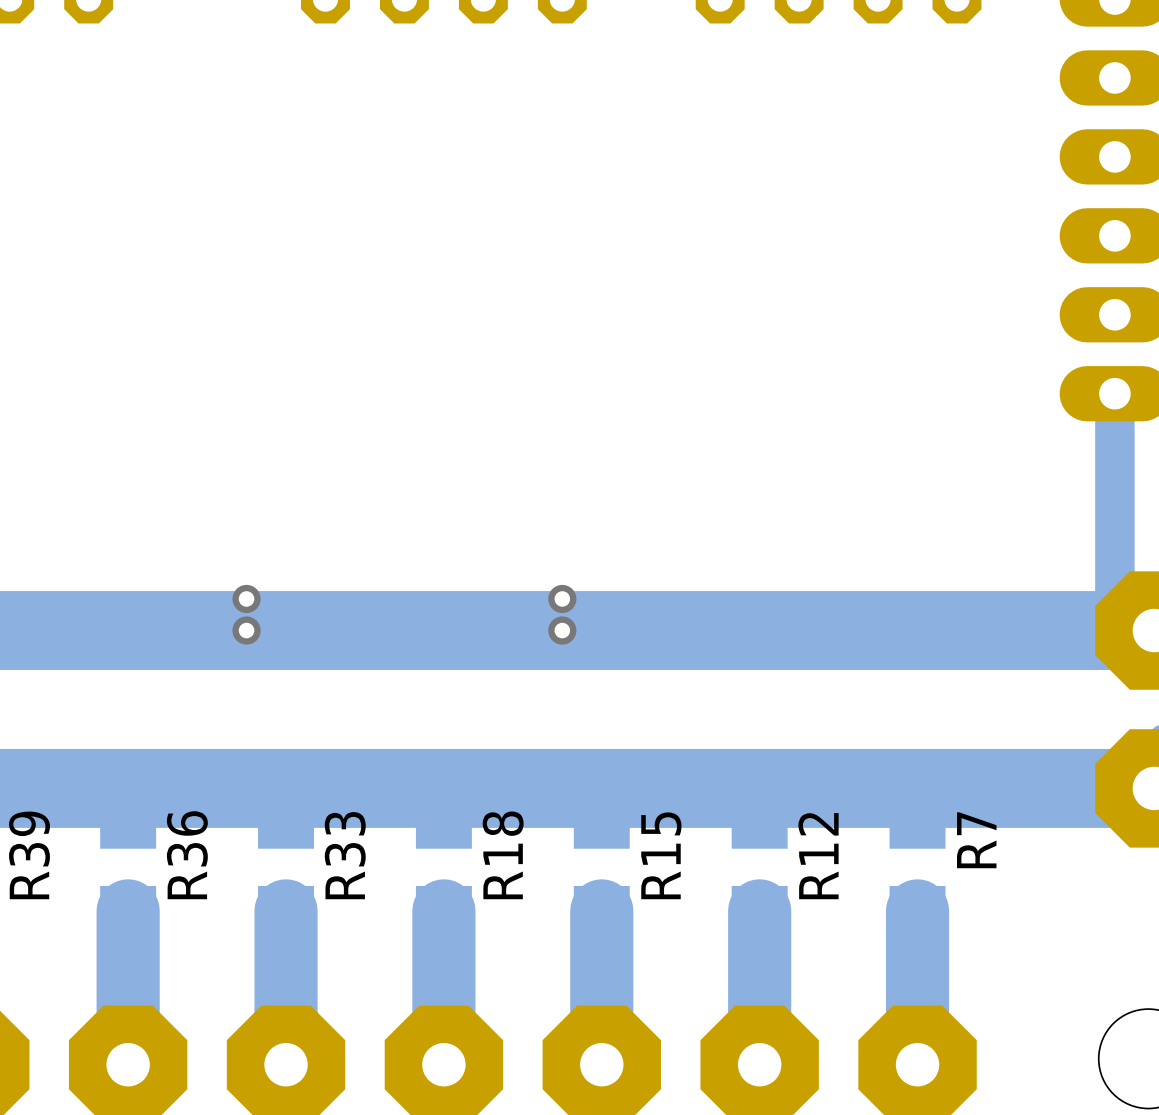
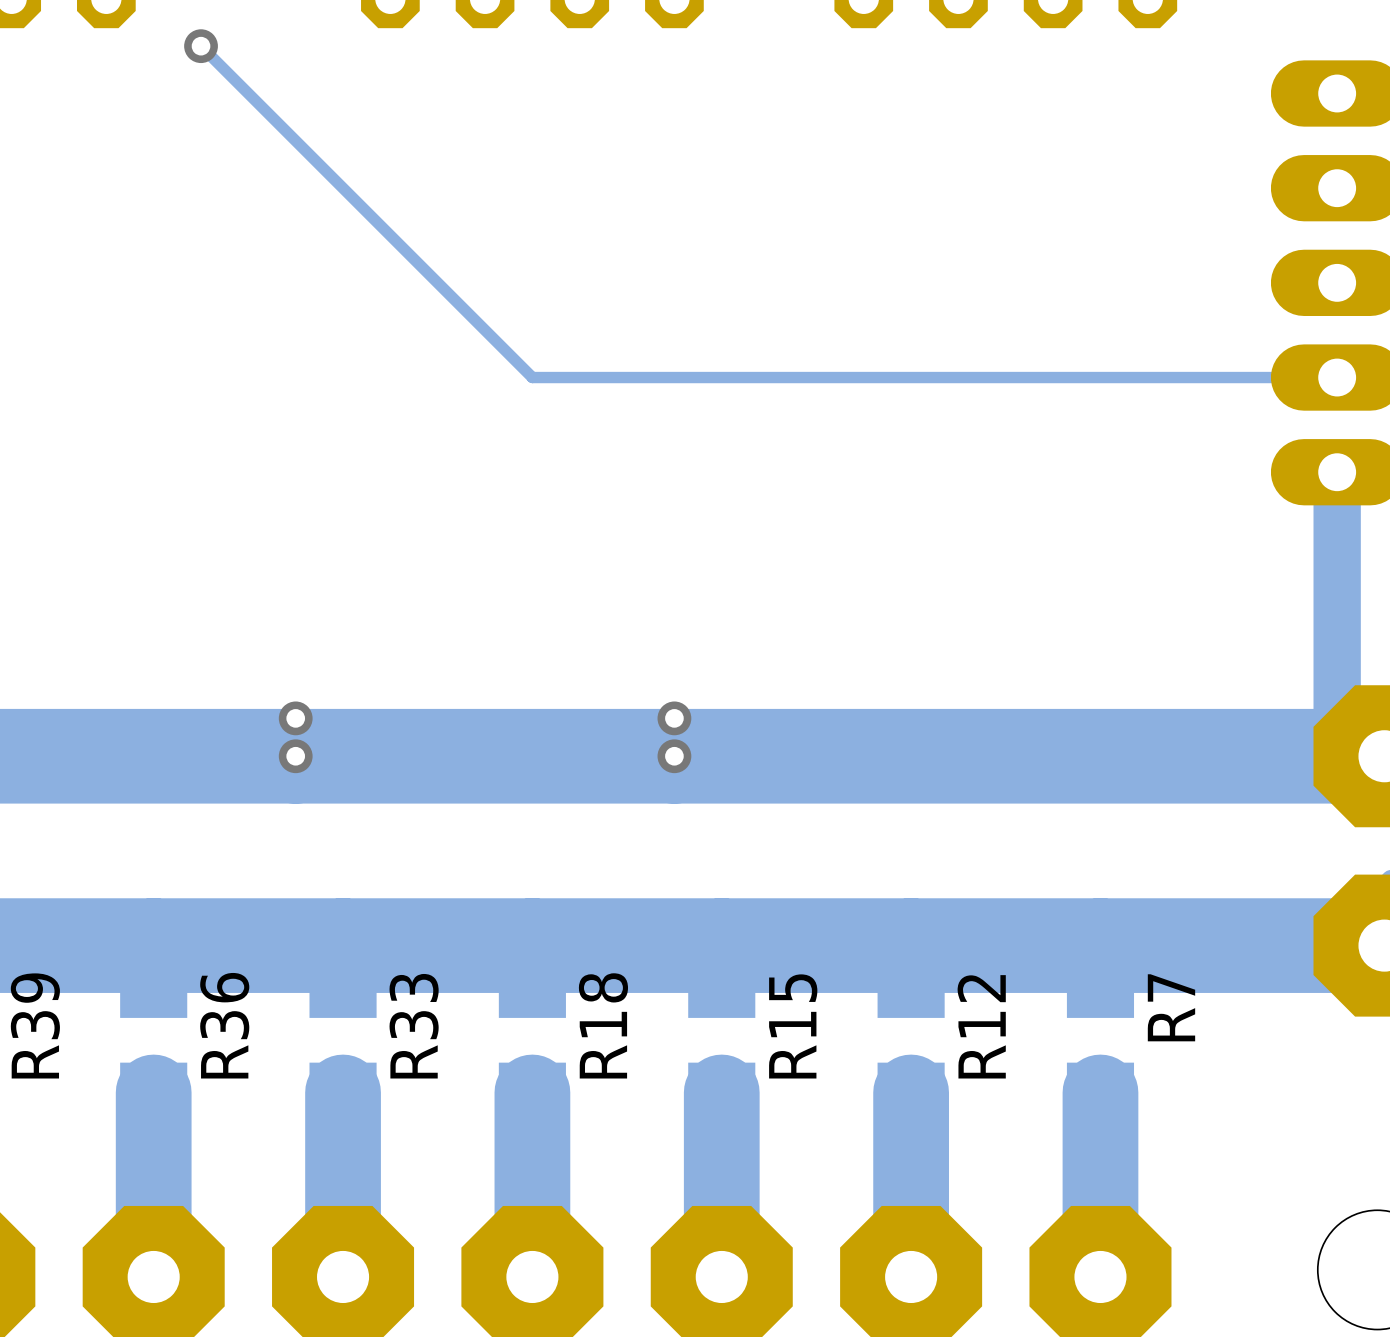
track: none -> (201, 46) (532, 377) (1337, 377)
via: none -> (201, 46)

